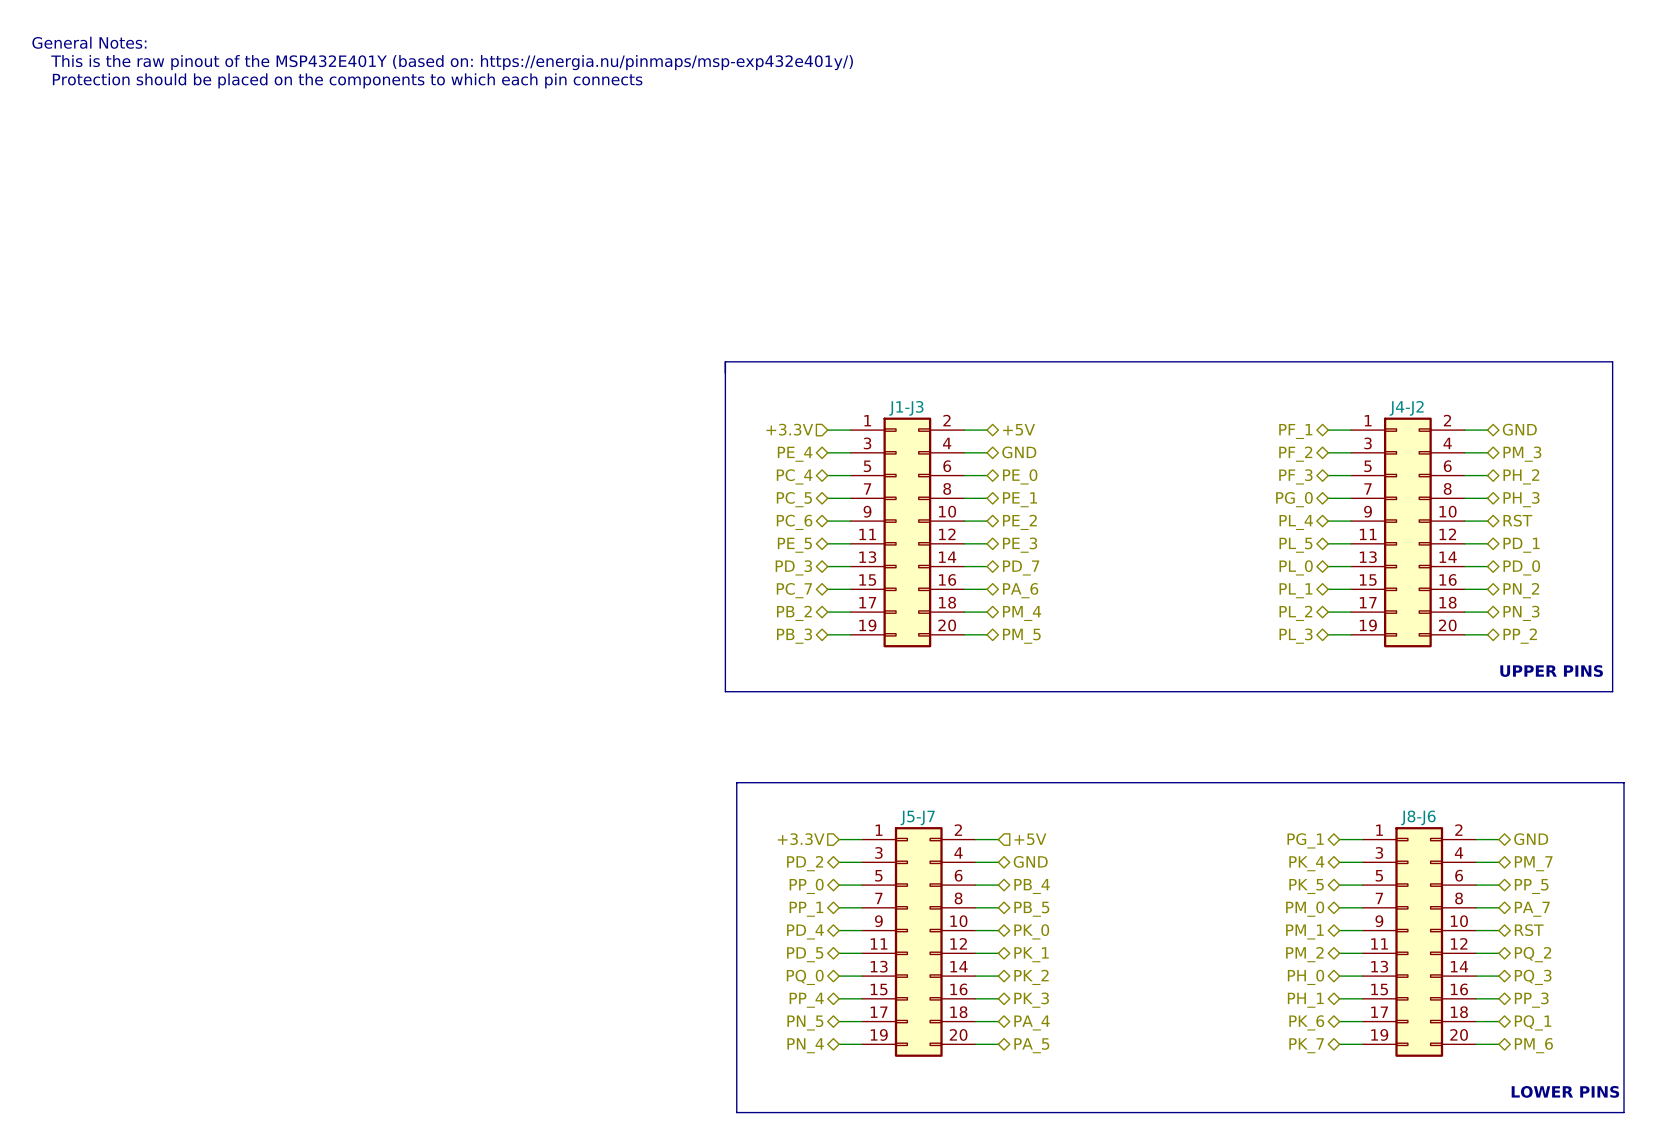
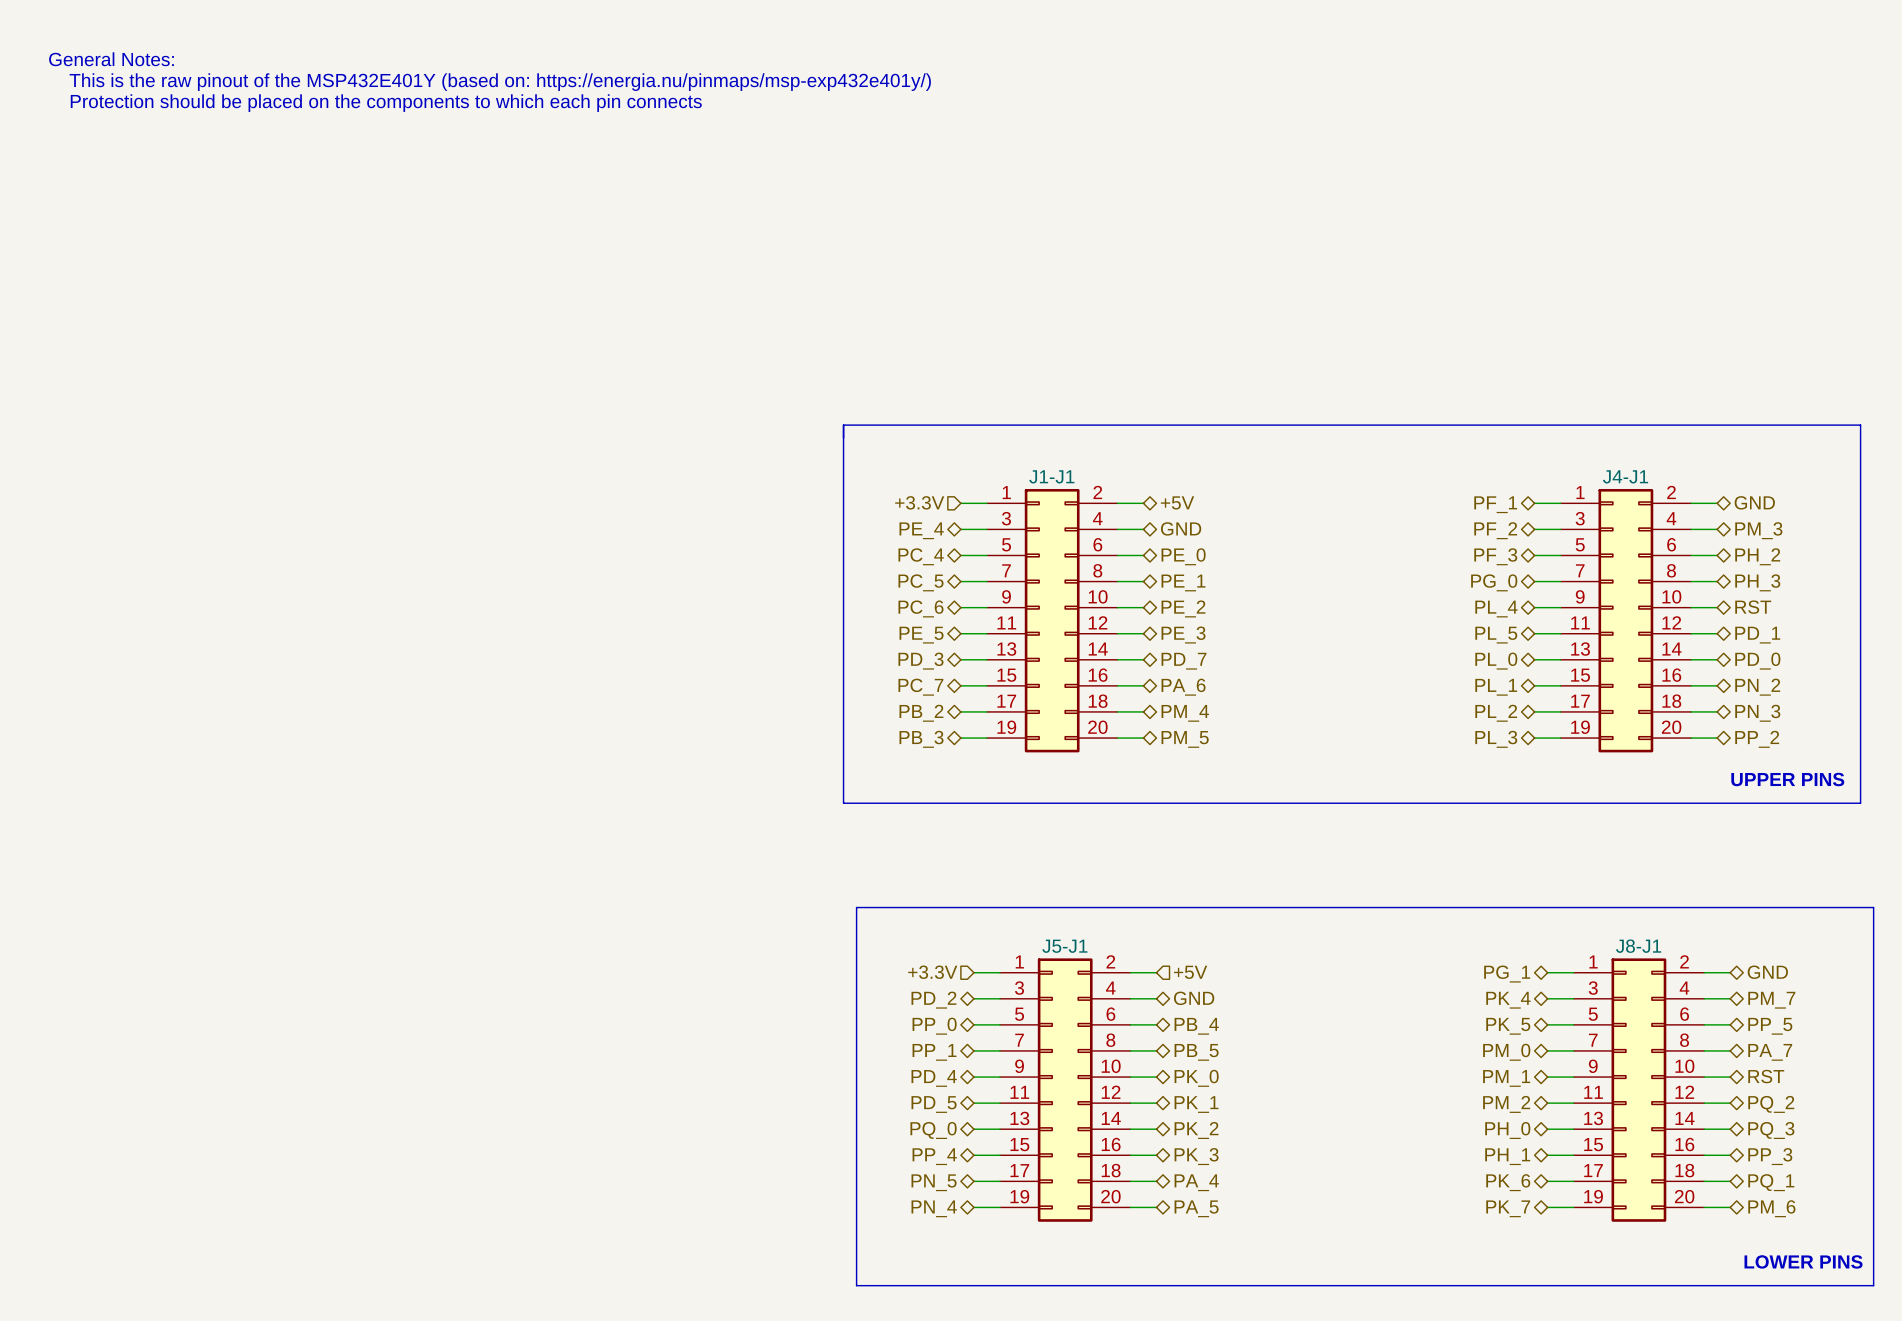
J1-J3 name: J1-J3 (906, 408) -> J1-J1 (1051, 476)
J4-J2 name: J4-J2 (1406, 408) -> J4-J1 (1625, 476)
J5-J7 name: J5-J7 (917, 817) -> J5-J1 (1064, 946)
J8-J6 name: J8-J6 (1418, 817) -> J8-J1 (1638, 946)

